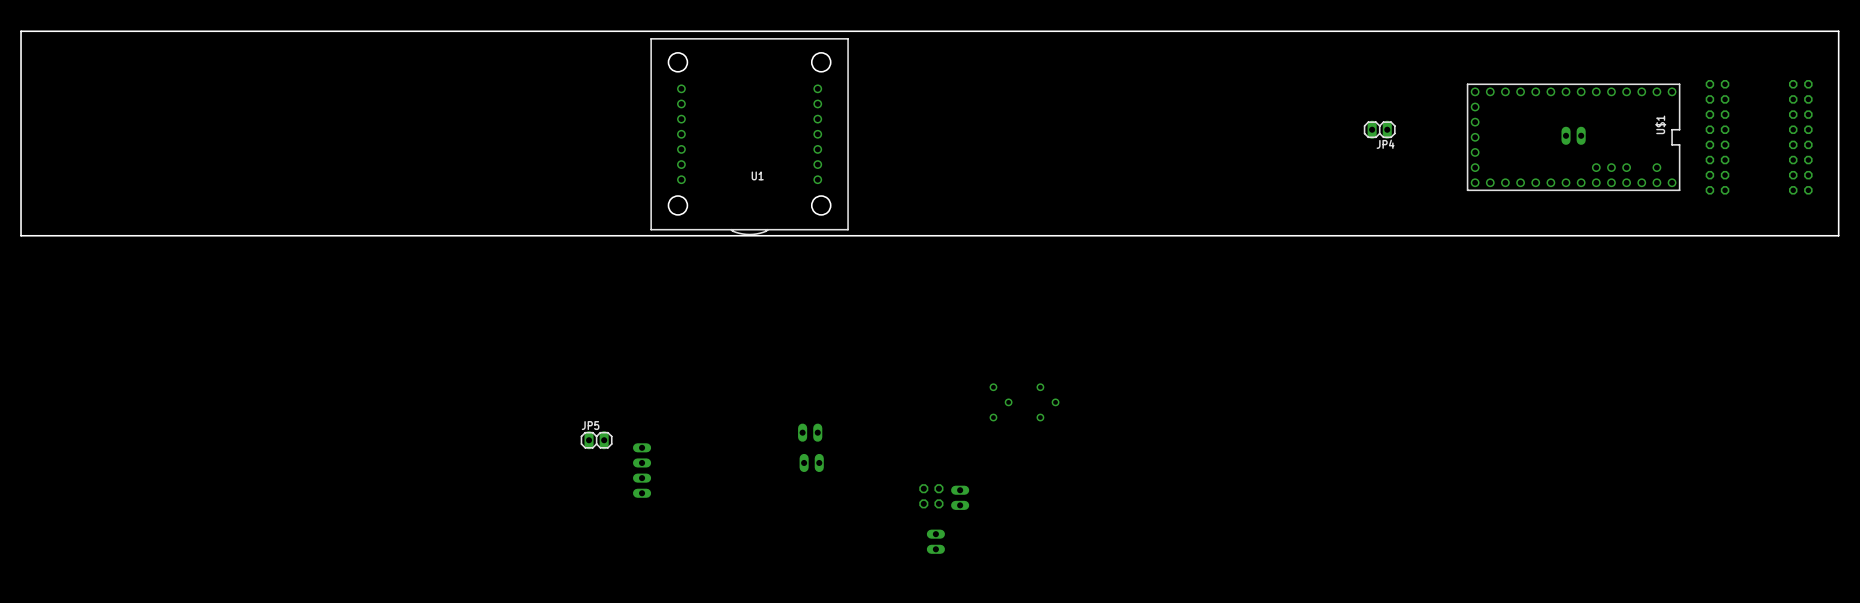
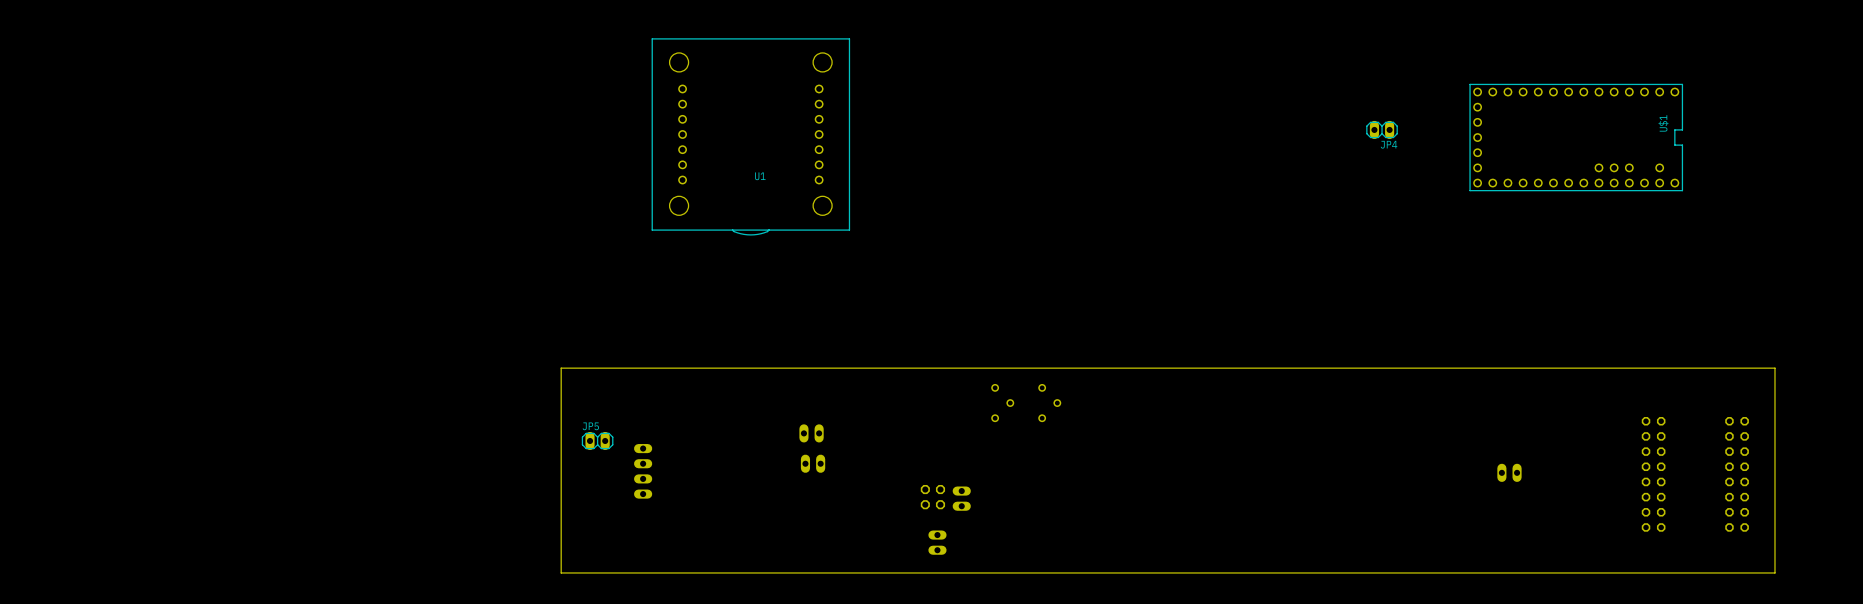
board edge: (1838, 31) (21, 31) (21, 235) (1838, 235) (1838, 31) -> none
part: (1573, 135) -> none
part: (1717, 137) -> none
part: (1800, 137) -> none
board edge: none -> (1774, 368) (561, 368) (561, 572) (1774, 572) (1774, 368)
part: none -> (1509, 472)
part: none -> (1653, 474)
part: none -> (1737, 474)

